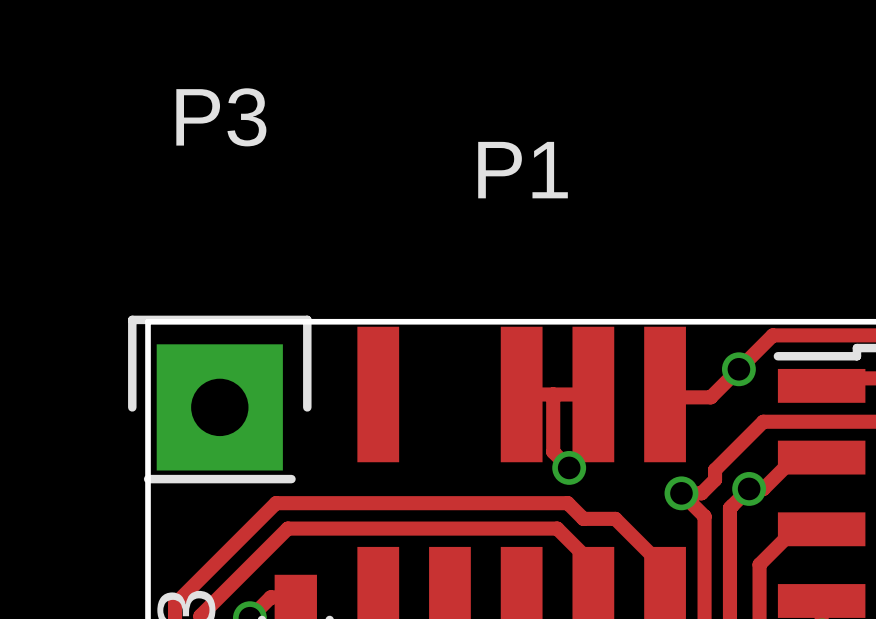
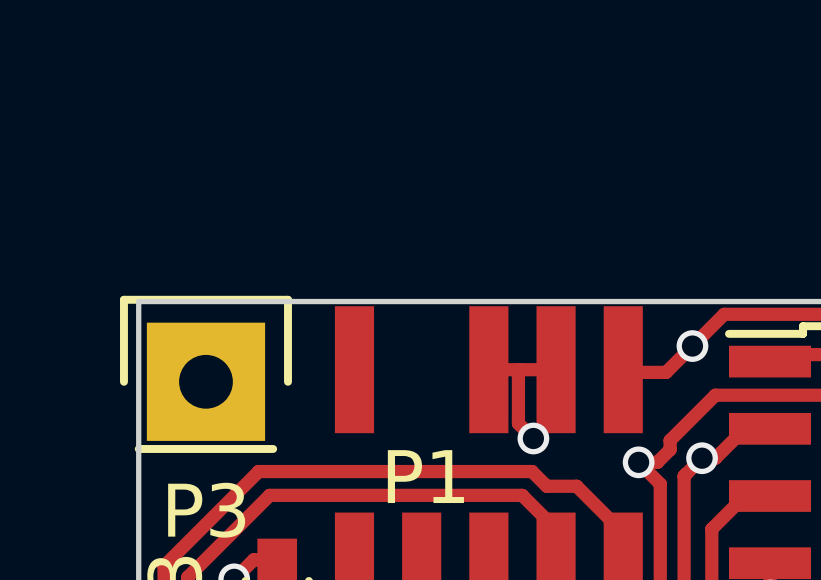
P3 name position: P3 (221, 117) -> P3 (206, 510)
P1 name position: P1 (523, 170) -> P1 (425, 476)

